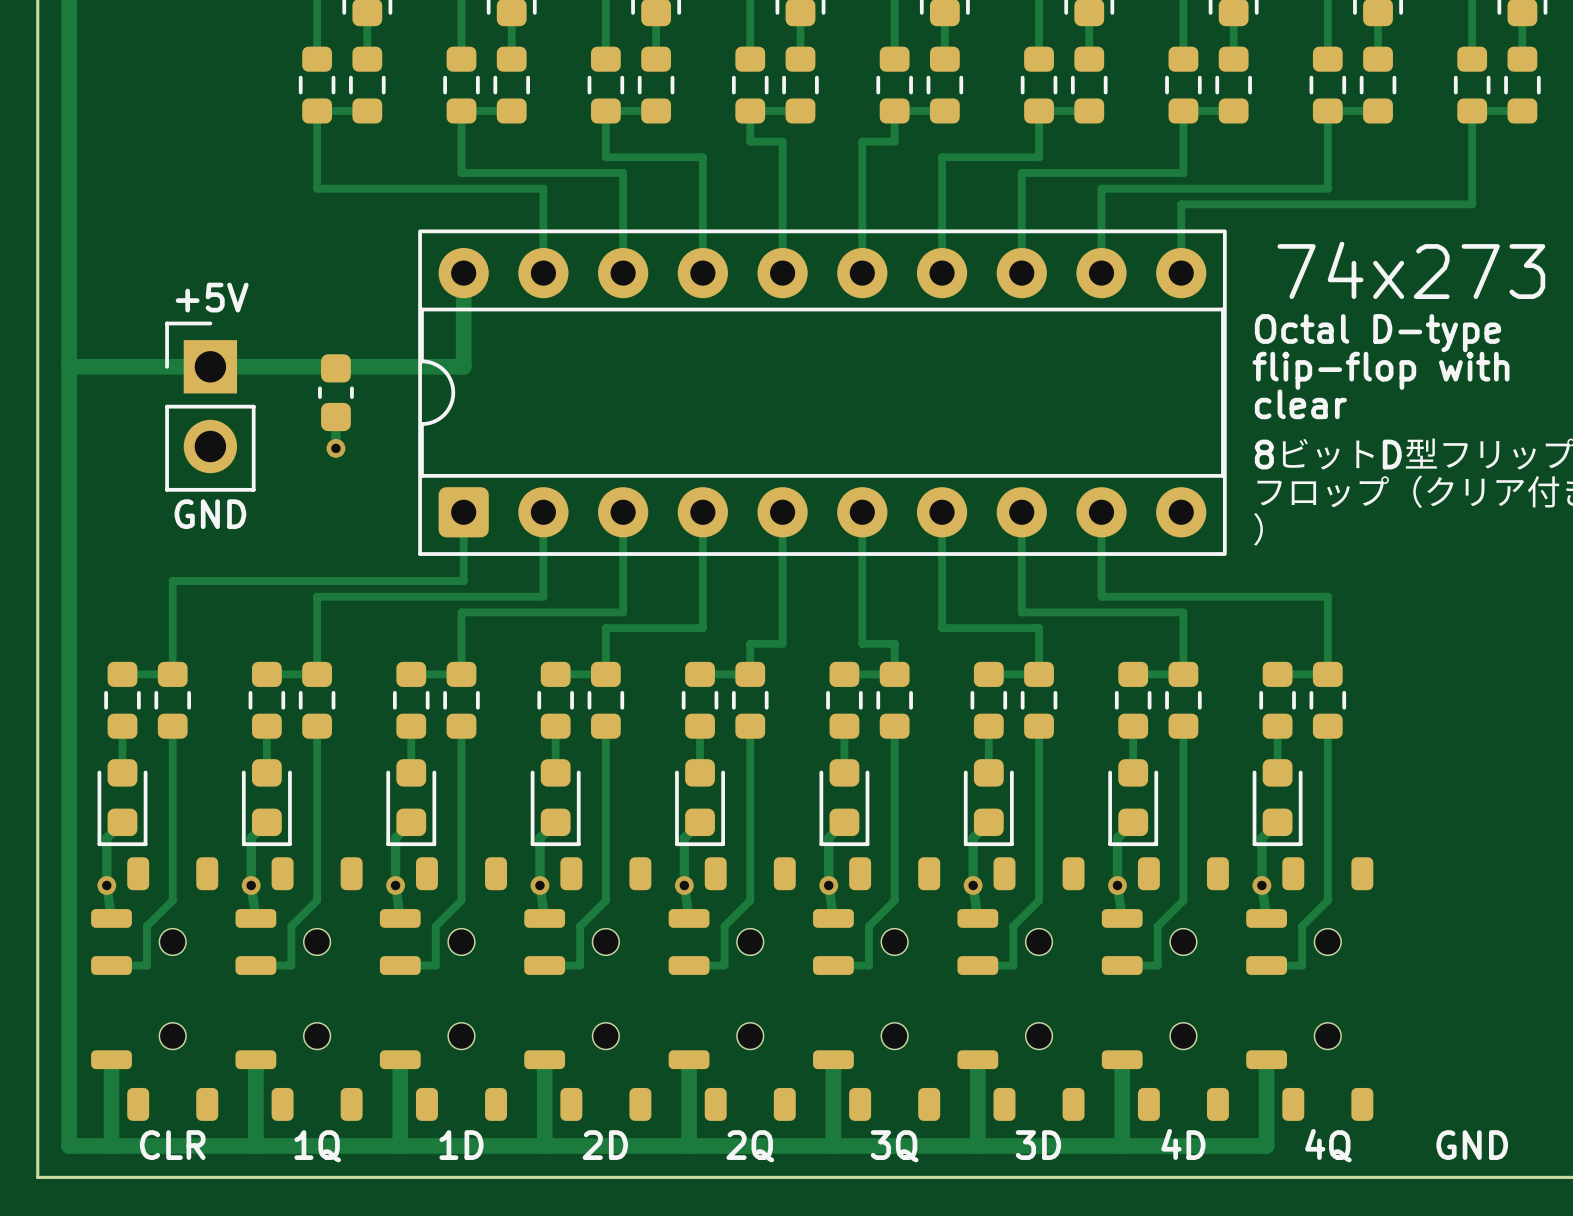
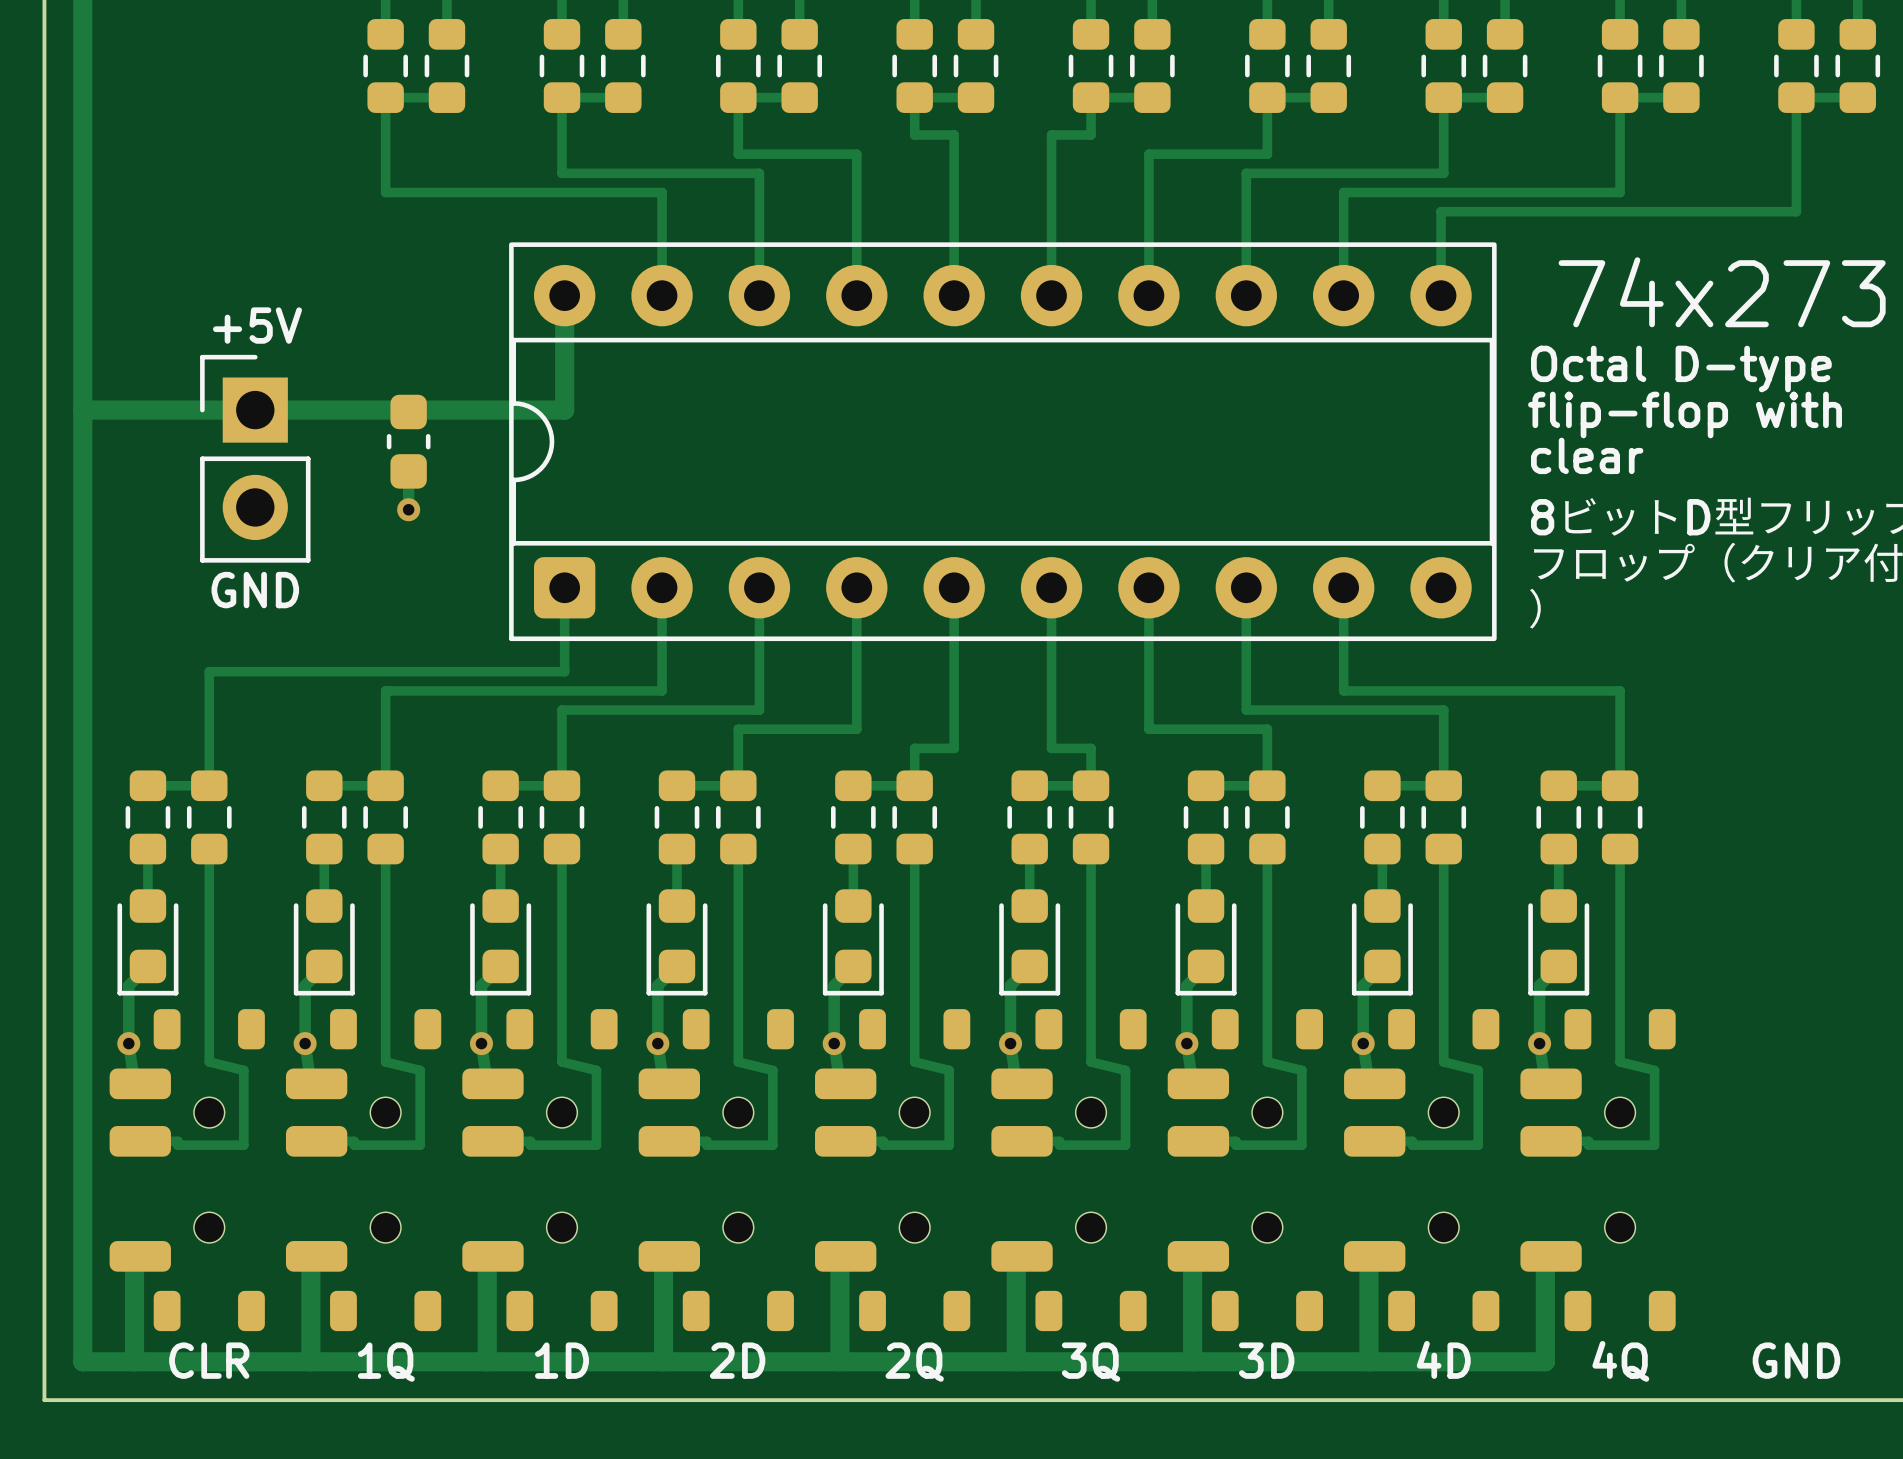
part footprint: [91, 857, 219, 1121] -> [109, 1009, 265, 1332]
part footprint: [235, 857, 363, 1121] -> [285, 1009, 442, 1332]
part footprint: [379, 857, 508, 1121] -> [462, 1009, 618, 1332]
part footprint: [524, 857, 652, 1121] -> [638, 1009, 794, 1332]
part footprint: [668, 857, 796, 1121] -> [815, 1009, 971, 1332]
part footprint: [813, 857, 941, 1121] -> [991, 1009, 1147, 1332]
part footprint: [957, 857, 1085, 1121] -> [1167, 1009, 1323, 1332]
part footprint: [1101, 857, 1229, 1121] -> [1344, 1009, 1500, 1332]
part footprint: [1246, 857, 1374, 1121] -> [1520, 1009, 1676, 1332]
track: (172, 900) (146, 926) (146, 965) -> (209, 1061) (243, 1070) (243, 1145) (177, 1145) (177, 1141)
track: (317, 900) (291, 926) (291, 965) -> (385, 1061) (420, 1070) (420, 1145) (354, 1145) (354, 1141)
track: (461, 900) (435, 926) (435, 965) -> (561, 1061) (596, 1070) (596, 1145) (530, 1145) (530, 1141)
track: (605, 900) (580, 926) (580, 965) -> (738, 1061) (772, 1070) (772, 1145) (706, 1145) (706, 1141)
track: (750, 900) (724, 926) (724, 965) -> (914, 1061) (949, 1070) (949, 1145) (883, 1145) (883, 1141)
track: (894, 900) (868, 926) (868, 965) -> (1091, 1061) (1125, 1070) (1125, 1145) (1059, 1145) (1059, 1141)
track: (1039, 900) (1013, 926) (1013, 965) -> (1267, 1061) (1301, 1070) (1301, 1145) (1235, 1145) (1235, 1141)
track: (1183, 900) (1157, 926) (1157, 965) -> (1443, 1061) (1478, 1070) (1478, 1145) (1412, 1145) (1412, 1141)
track: (1327, 900) (1302, 926) (1302, 965) -> (1620, 1061) (1654, 1070) (1654, 1145) (1588, 1145) (1588, 1141)

